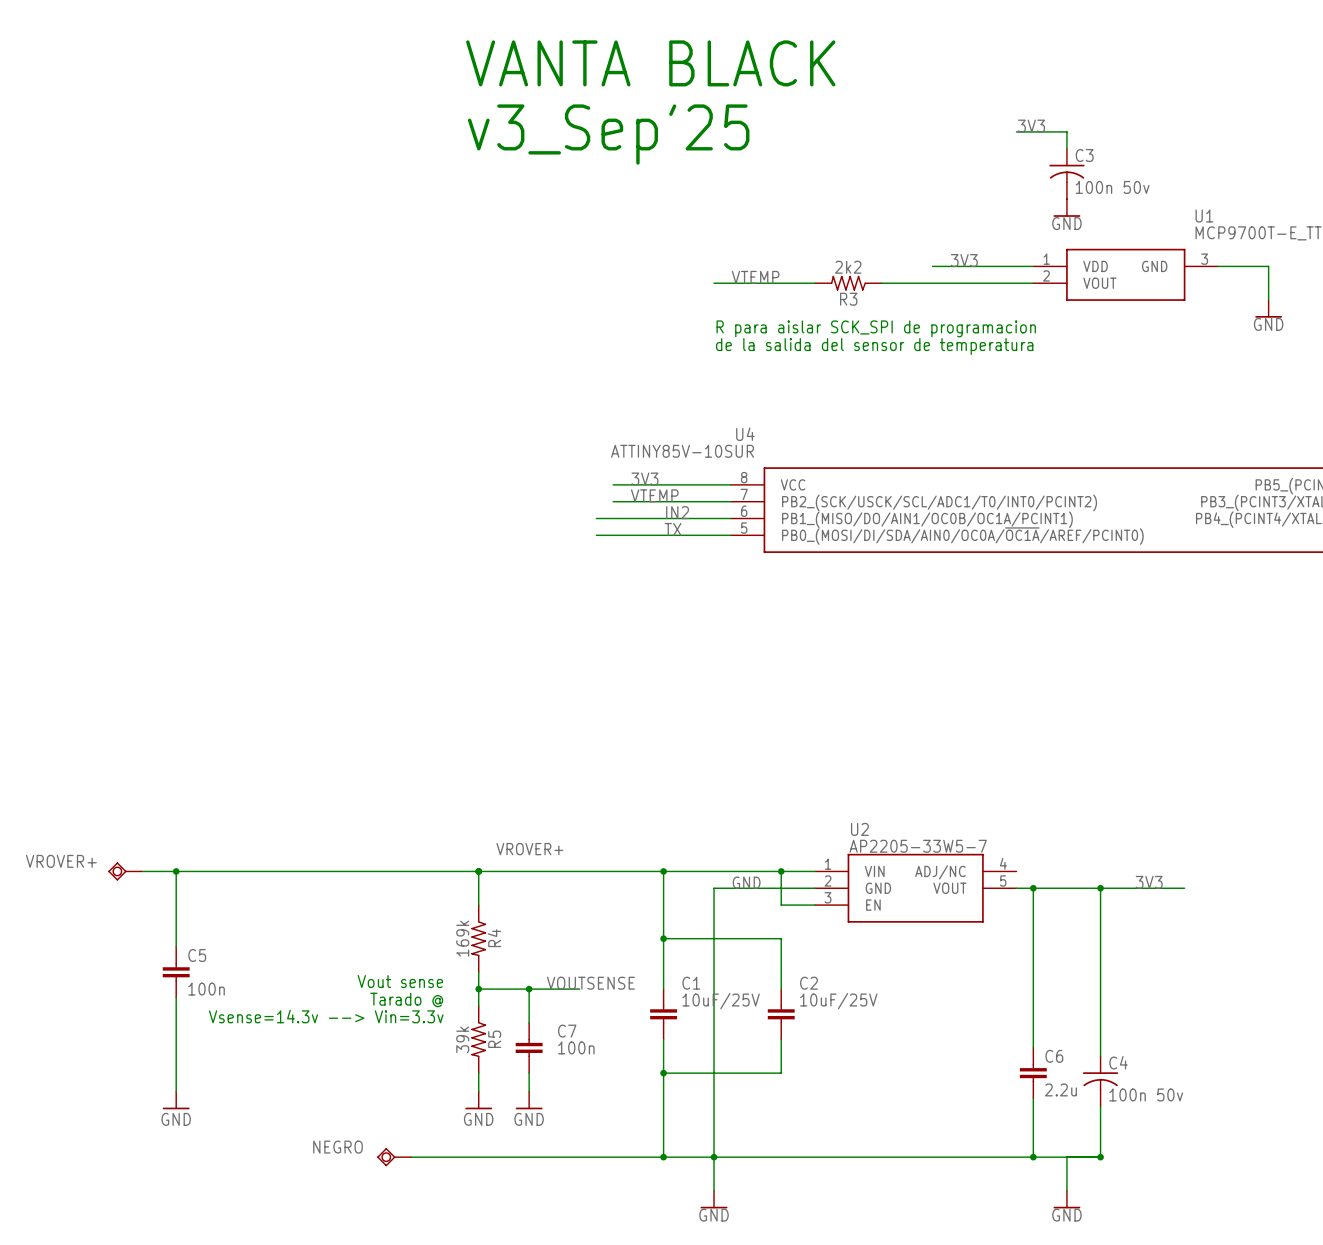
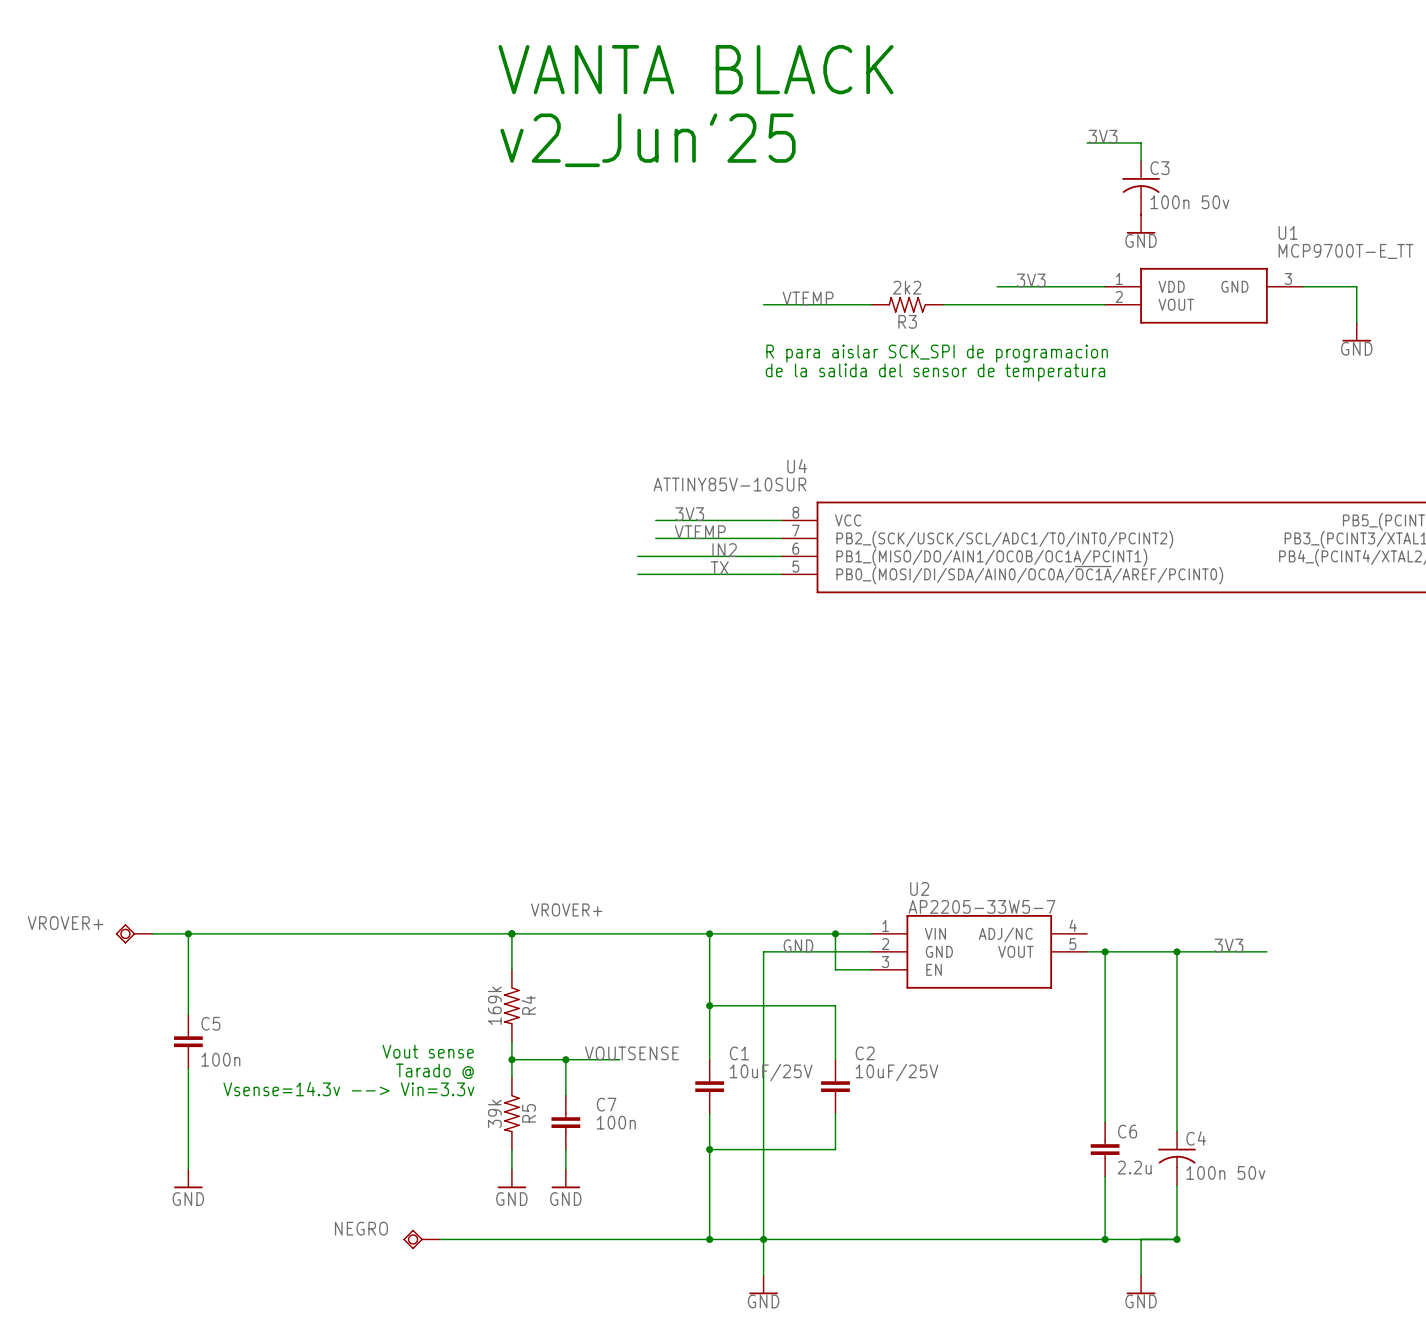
text: v3_Sep'25 (608, 134) -> v2_Jun'25 (648, 140)

